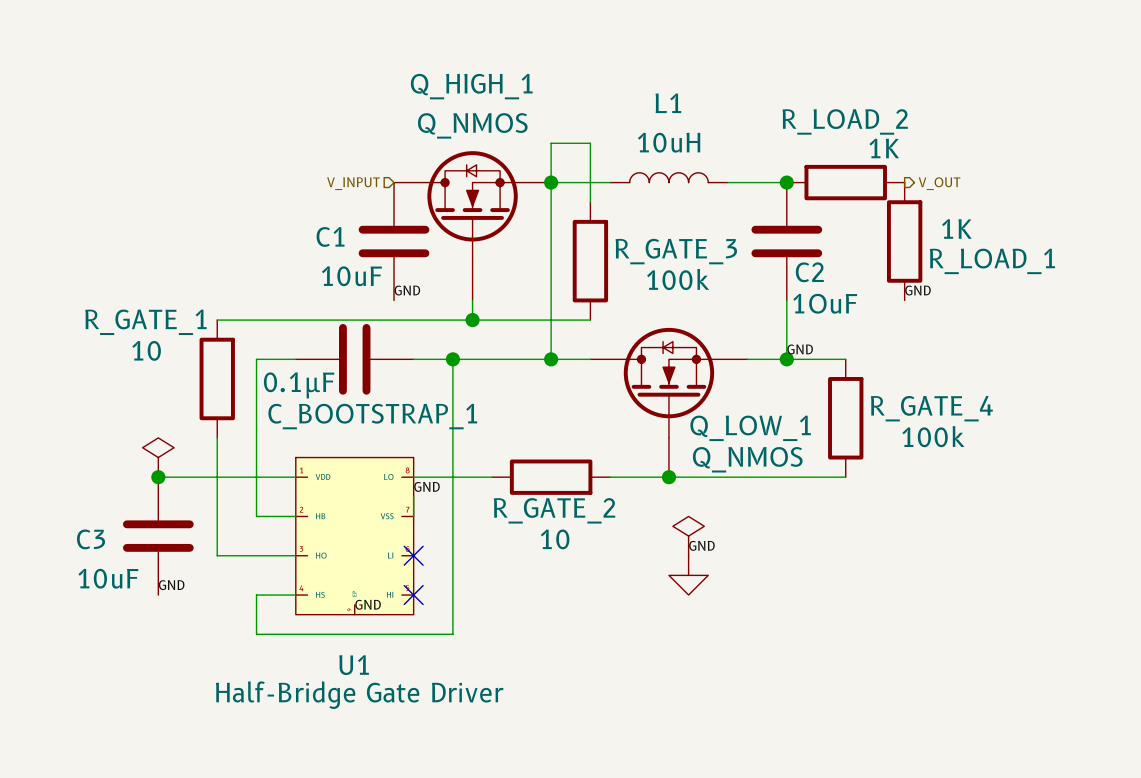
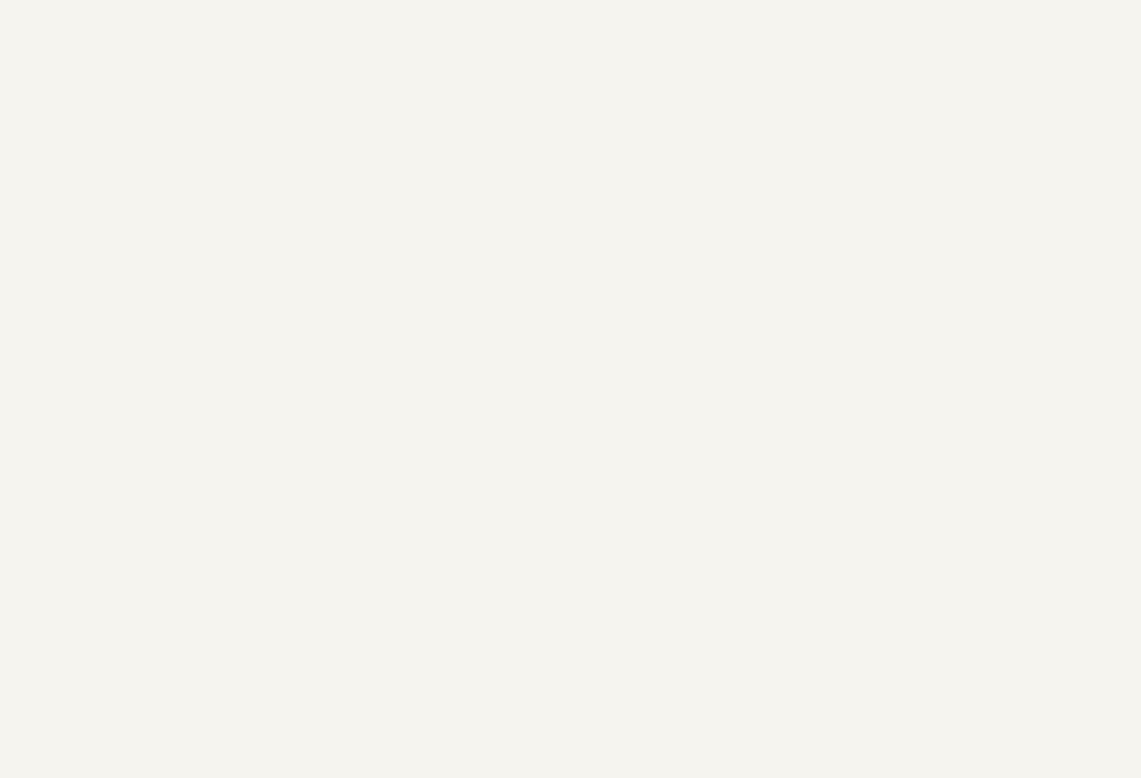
L1: 10uH (668, 177) -> none
wire: (551, 182) (610, 182) -> none
junction: (551, 182) -> none
wire: (727, 182) (786, 182) -> none
junction: (786, 182) -> none
R_LOAD_2: 1K (845, 182) -> none
hierarchical label: V_INPUT (353, 183) -> none
hierarchical label: V_OUT (939, 183) -> none
wire: (590, 202) (590, 143) (551, 143) (551, 359) -> none
Q_HIGH_1: Q_NMOS (472, 225) -> none
C1: 10uF (394, 241) -> none
C2: 1OuF (786, 241) -> none
R_LOAD_1: 1K (904, 241) -> none
R_GATE_3: 100k (590, 261) -> none
label: GND (407, 290) -> none
label: GND (917, 290) -> none
wire: (472, 300) (472, 320) -> none
wire: (786, 300) (786, 359) -> none
wire: (217, 320) (590, 320) -> none
junction: (472, 320) -> none
label: GND (800, 349) -> none
wire: (295, 359) (256, 359) (256, 516) (295, 516) -> none
C_BOOTSTRAP_1: 0.1µF (354, 359) -> none
wire: (413, 359) (590, 359) -> none
wire: (452, 359) (452, 634) (256, 634) (256, 595) (295, 595) -> none
junction: (452, 359) -> none
junction: (551, 359) -> none
wire: (747, 359) (845, 359) -> none
junction: (786, 359) -> none
R_GATE_1: 10 (217, 378) -> none
Q_LOW_1: Q_NMOS (668, 402) -> none
R_GATE_4: 100k (845, 418) -> none
wire: (217, 437) (217, 555) (295, 555) -> none
power symbol: (158, 457) -> none
wire: (158, 477) (295, 477) -> none
junction: (158, 477) -> none
wire: (413, 477) (492, 477) -> none
R_GATE_2: 10 (551, 477) -> none
wire: (610, 477) (845, 477) -> none
junction: (668, 477) -> none
label: GND (426, 486) -> none
wire: (413, 496) (413, 516) -> none
C3: 10uF (158, 536) -> none
U1: Half-Bridge Gate Driver (354, 536) -> none
power symbol: (688, 536) -> none
label: GND (701, 545) -> none
no-connect mark: (413, 555) -> none
power symbol: (688, 575) -> none
label: GND (171, 585) -> none
no-connect mark: (413, 595) -> none
label: GND (368, 604) -> none

